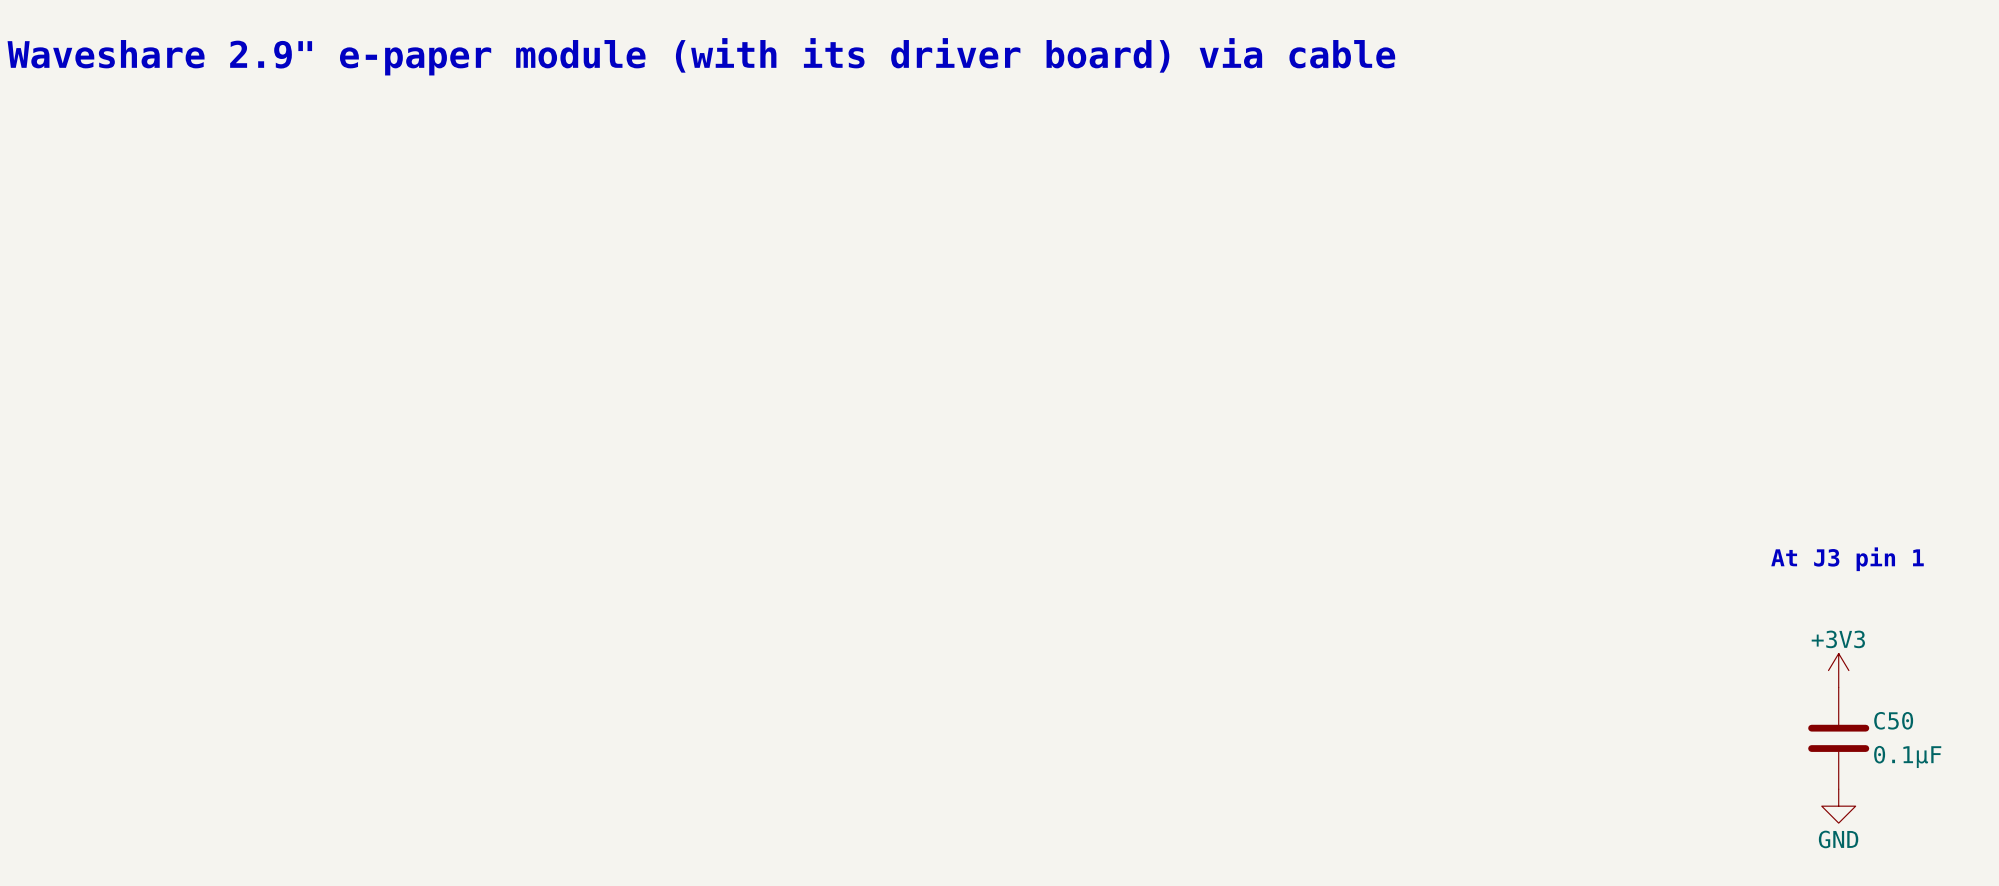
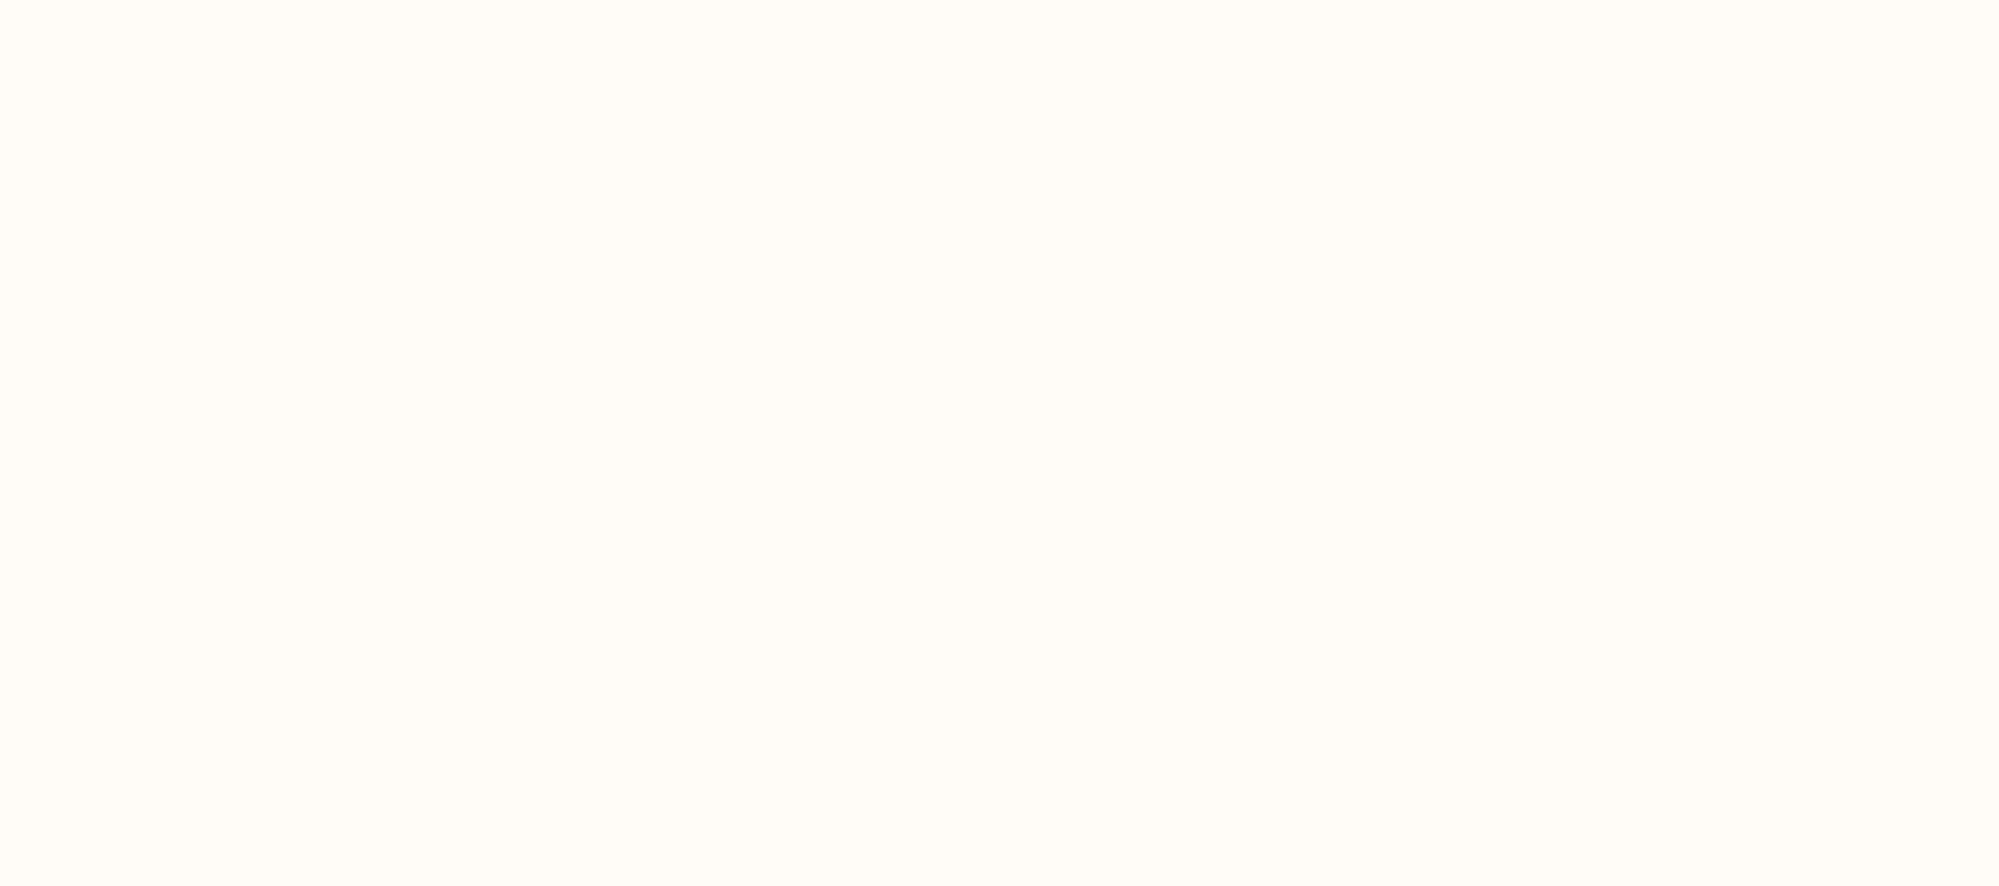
text: Waveshare 2.9" e-paper module (with its driver board) via cable (701, 56) -> none
text: At J3 pin 1 (1847, 559) -> none
power symbol: +3V3 (1838, 670) -> none
C50: 0.1µF (1838, 738) -> none
power symbol: GND (1838, 806) -> none

